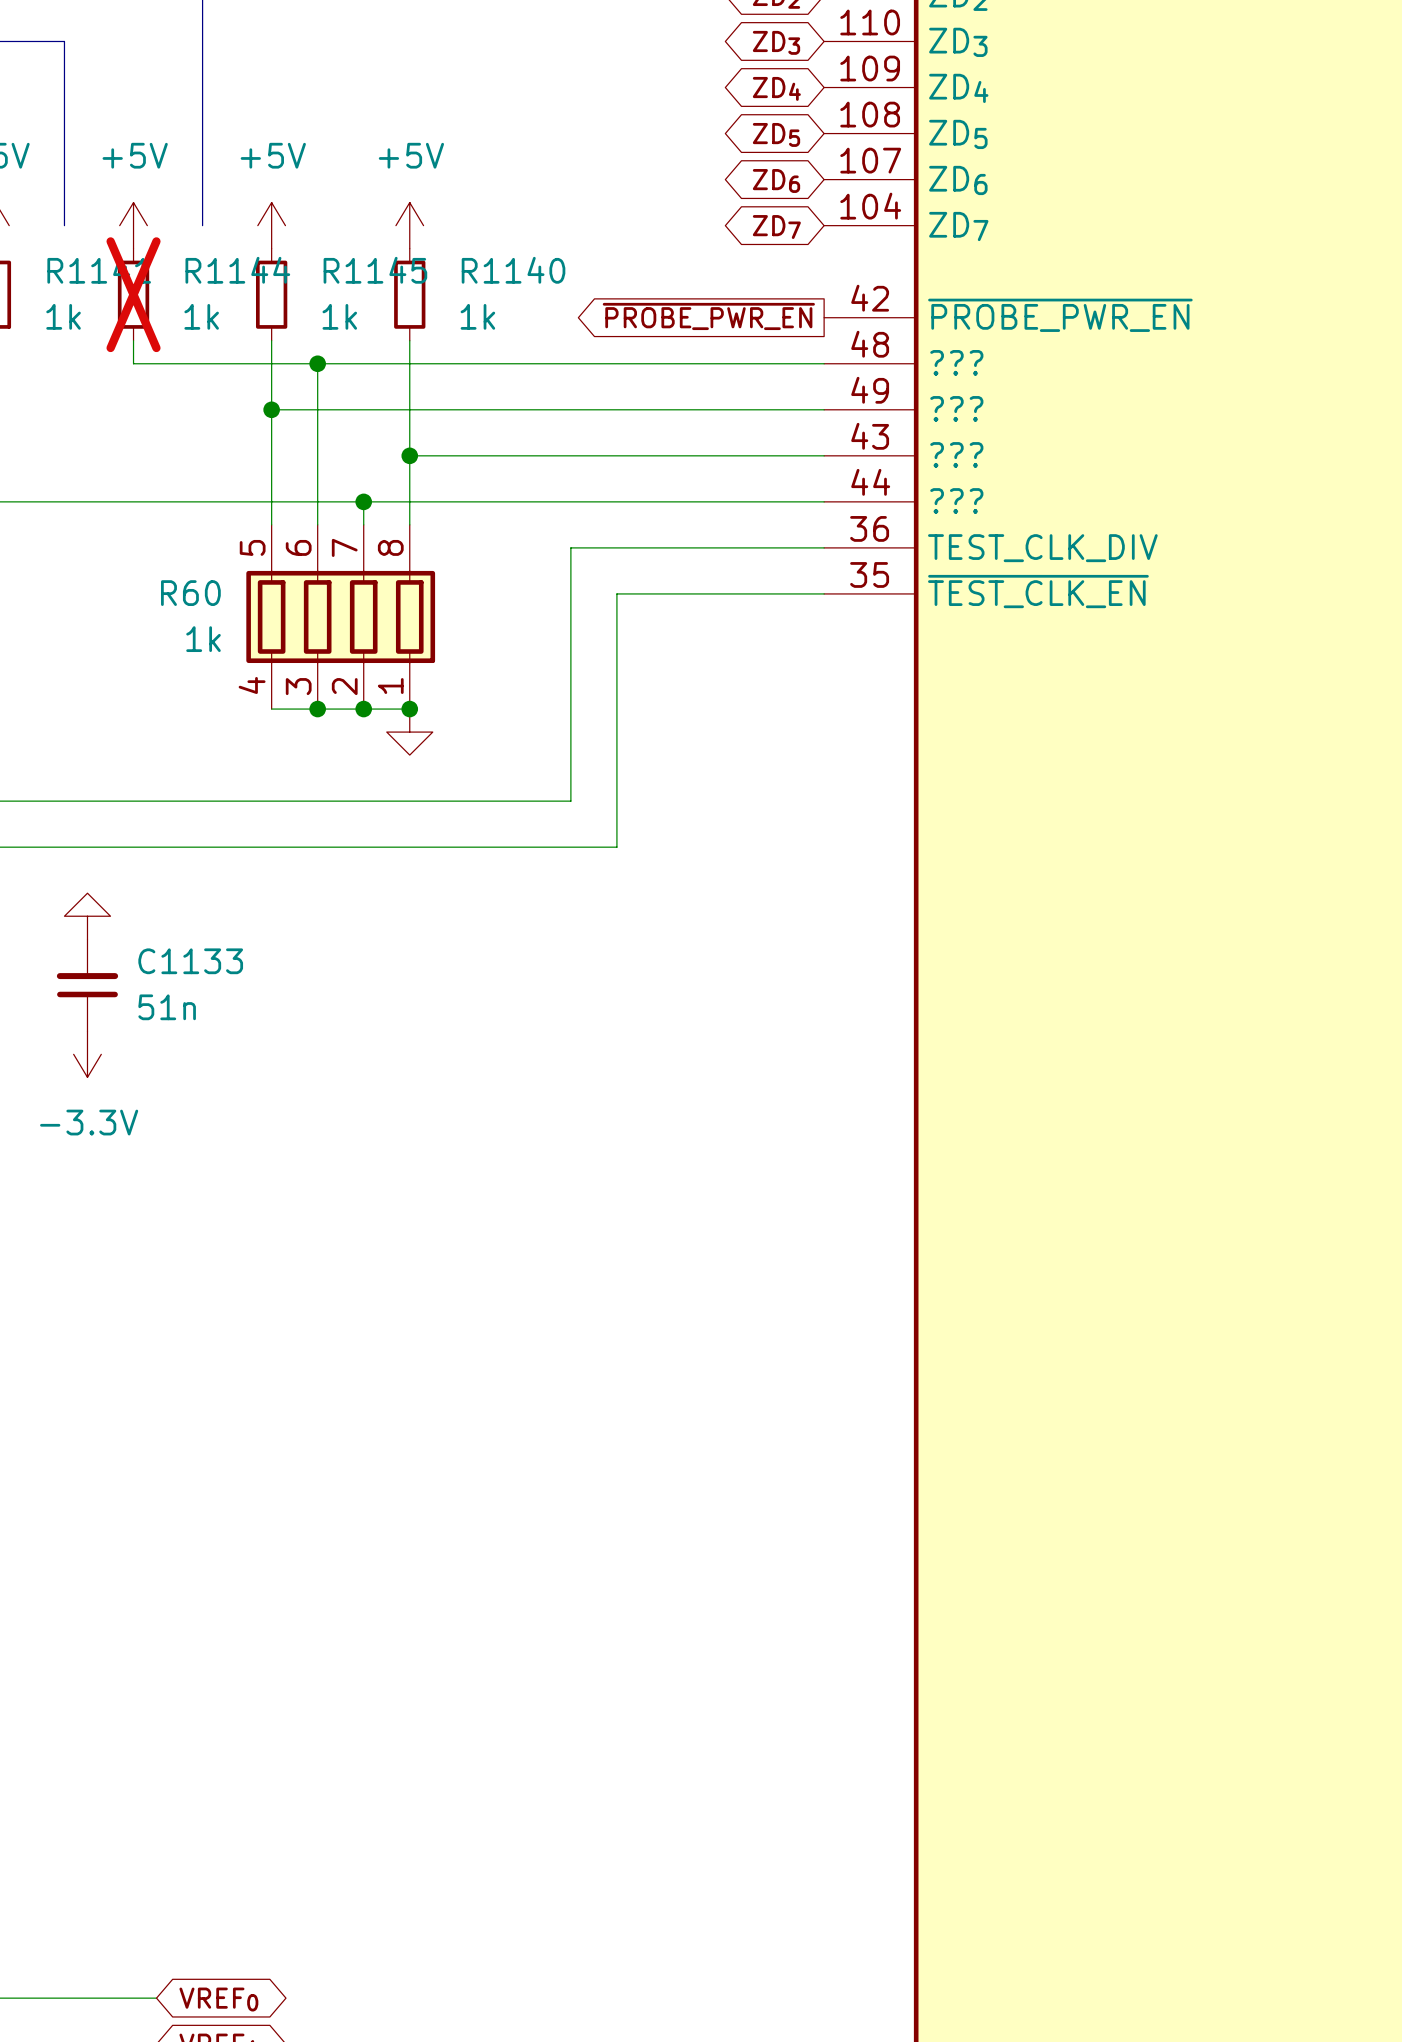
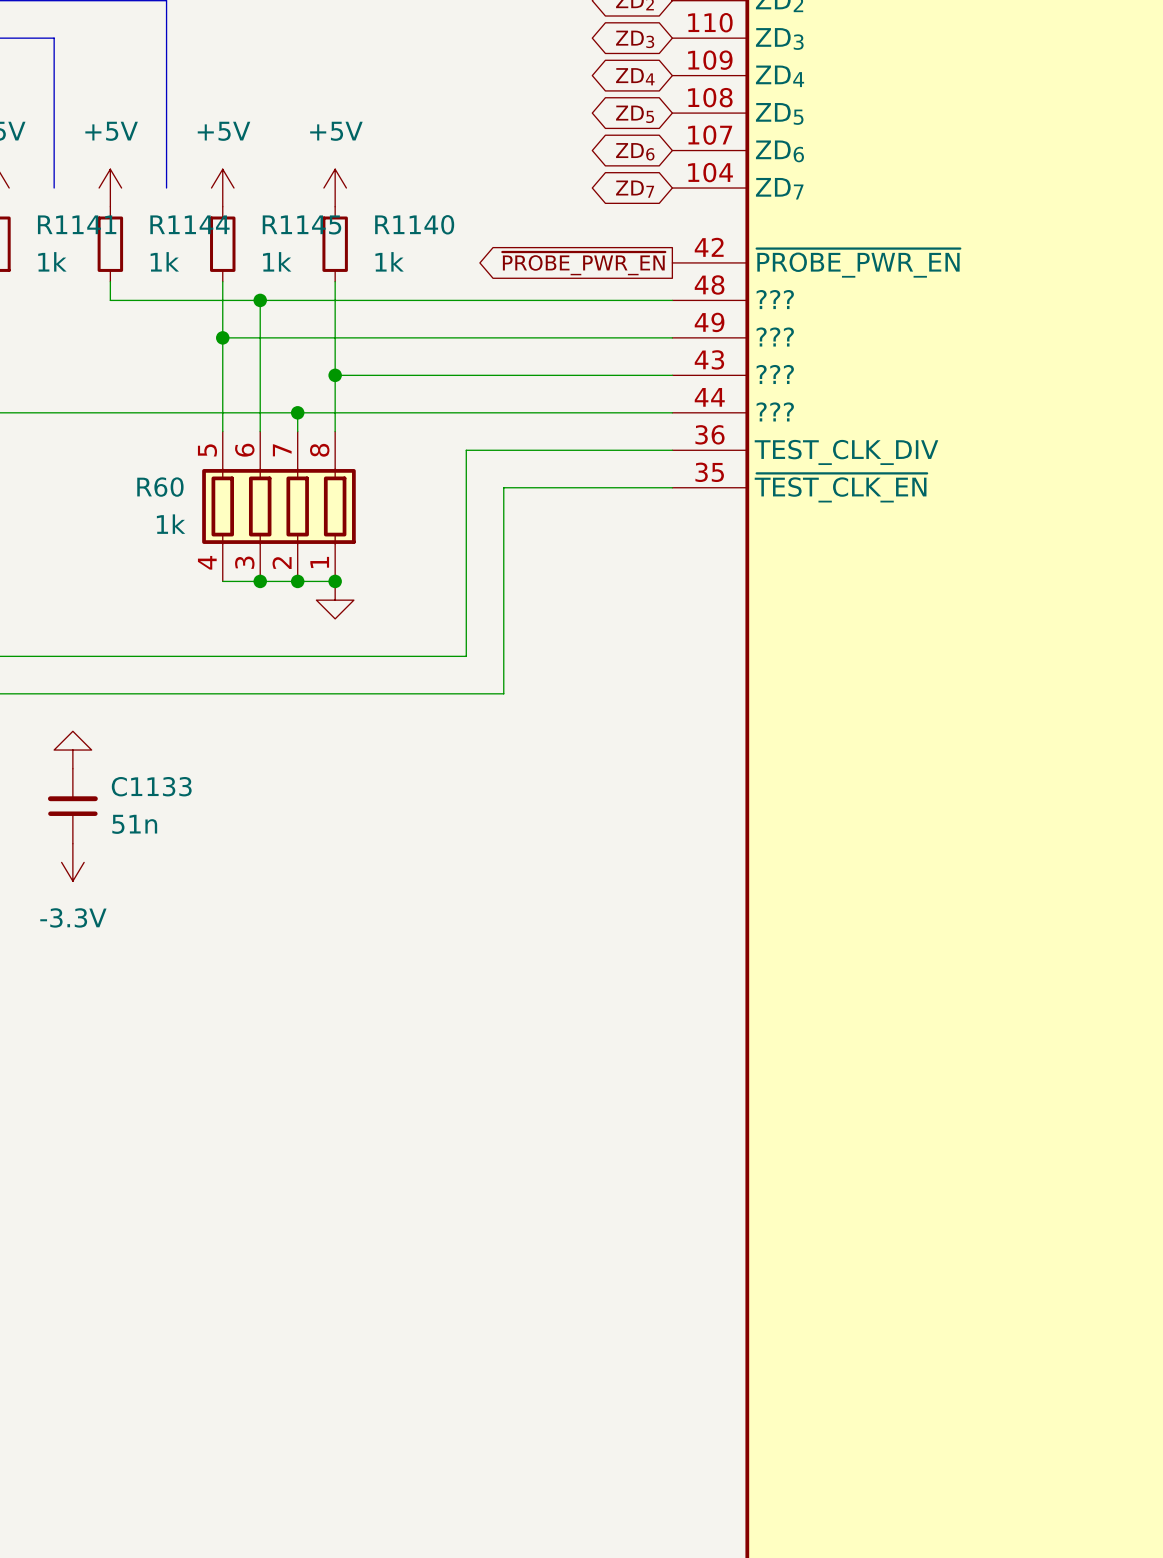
R1144 do-not-place cross: (133, 294) -> none

